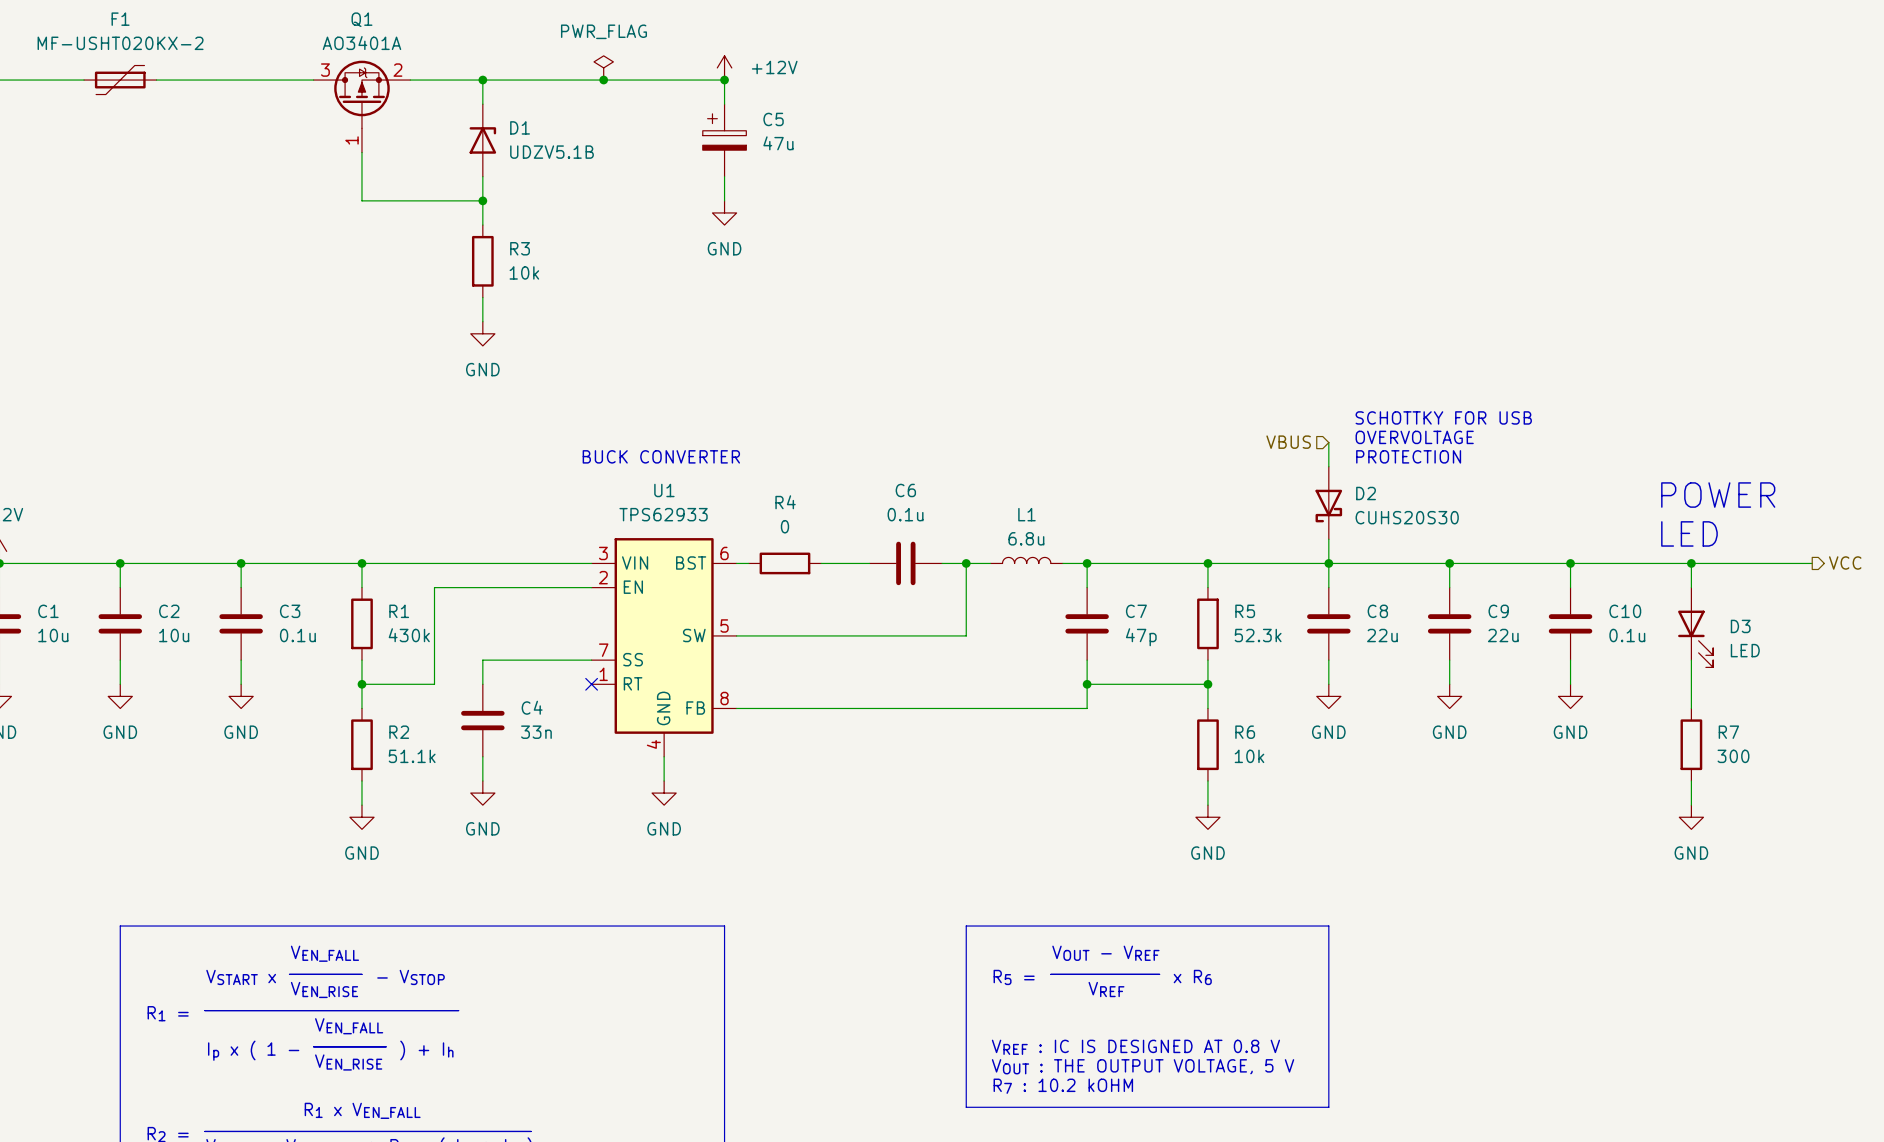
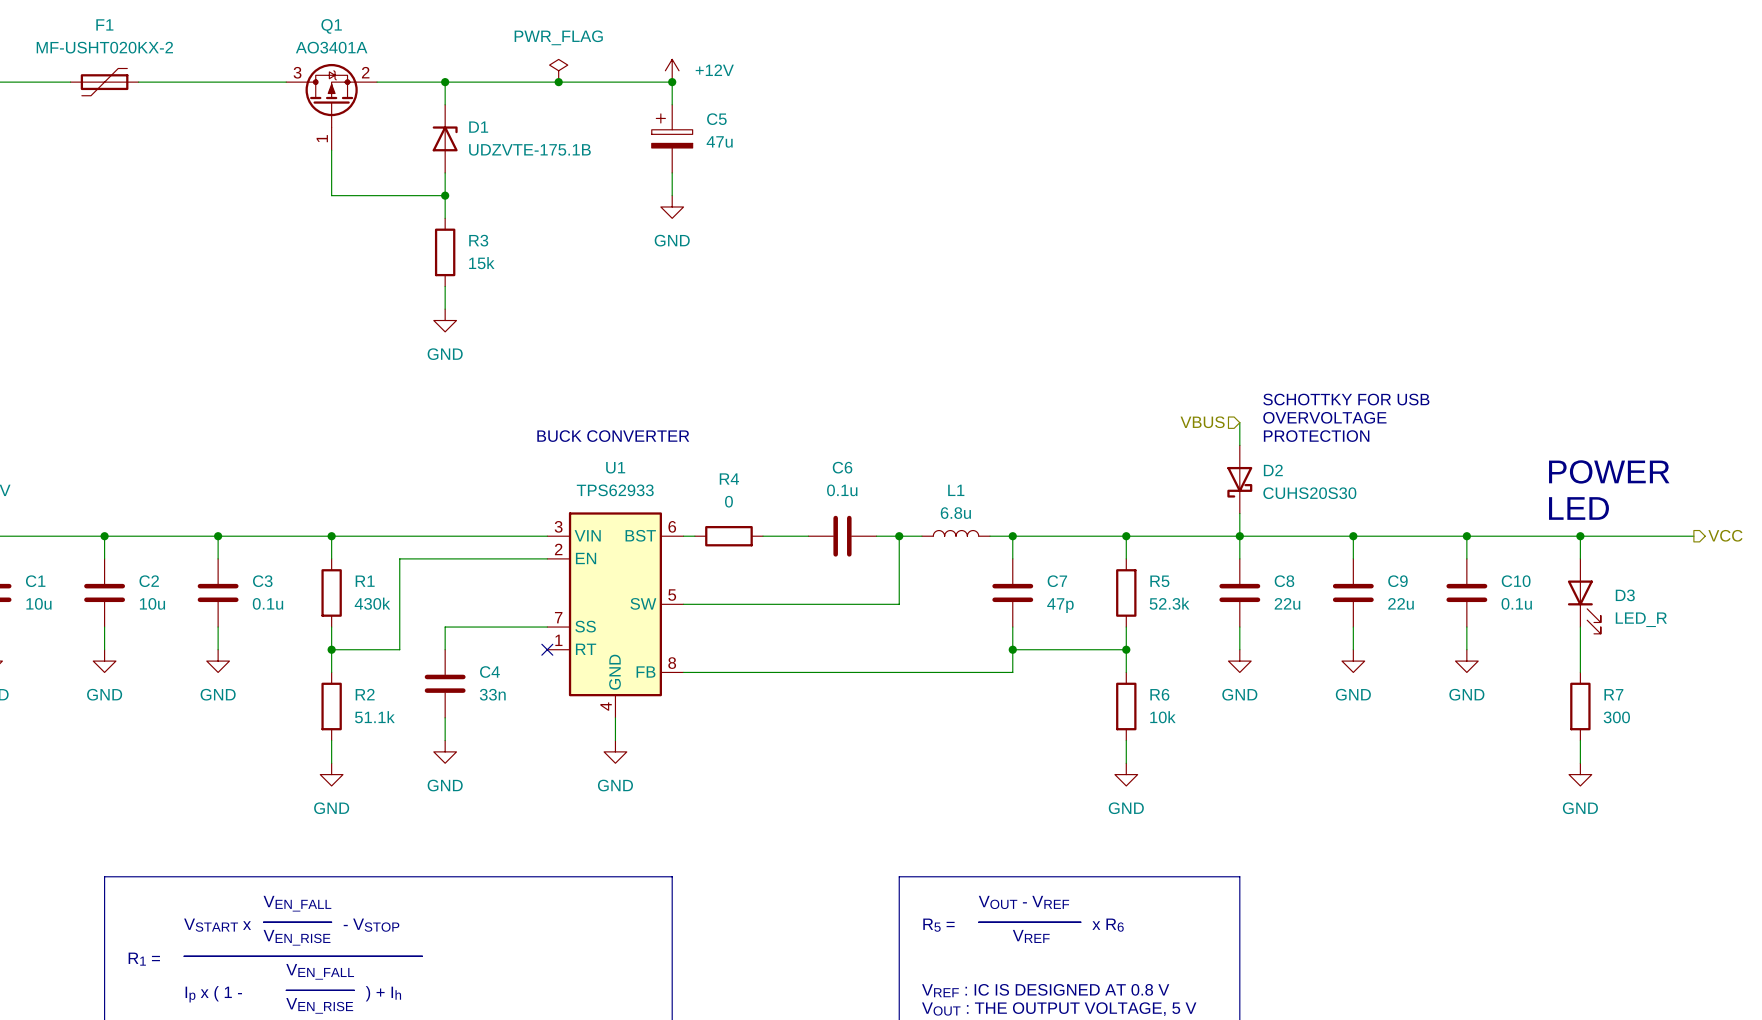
D1 value: UDZV5.1B (551, 152) -> UDZVTE-175.1B (529, 149)
R3 value: 10k (524, 272) -> 15k (481, 263)
D3 value: LED (1745, 650) -> LED_R (1641, 619)

